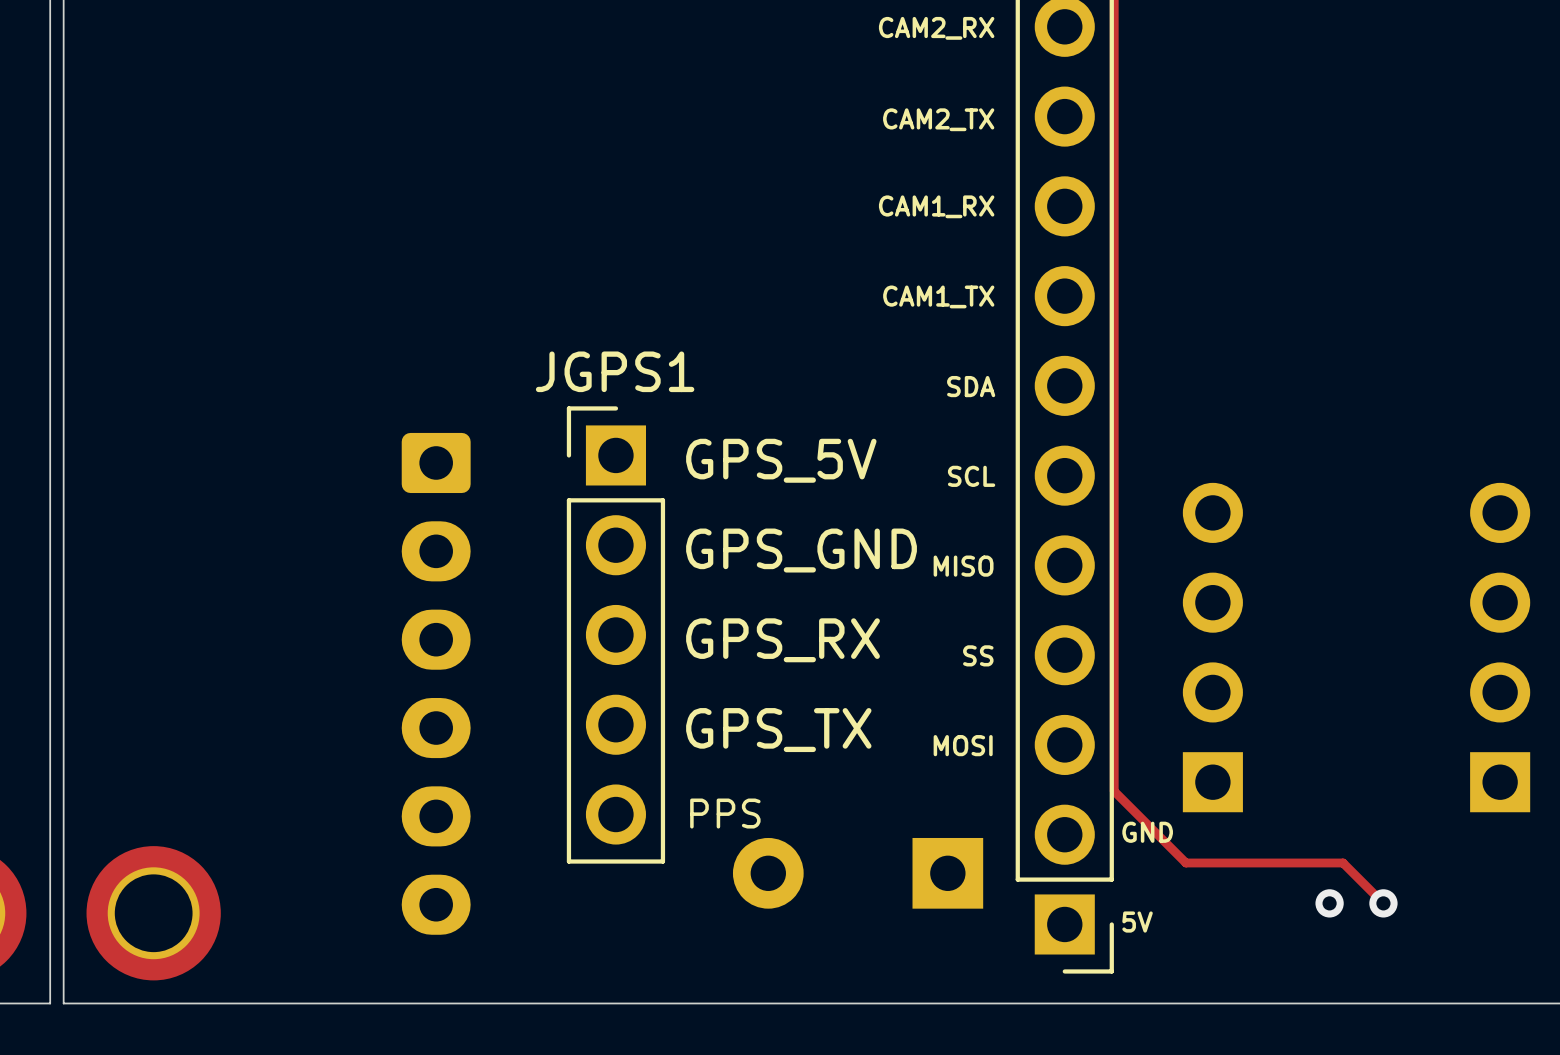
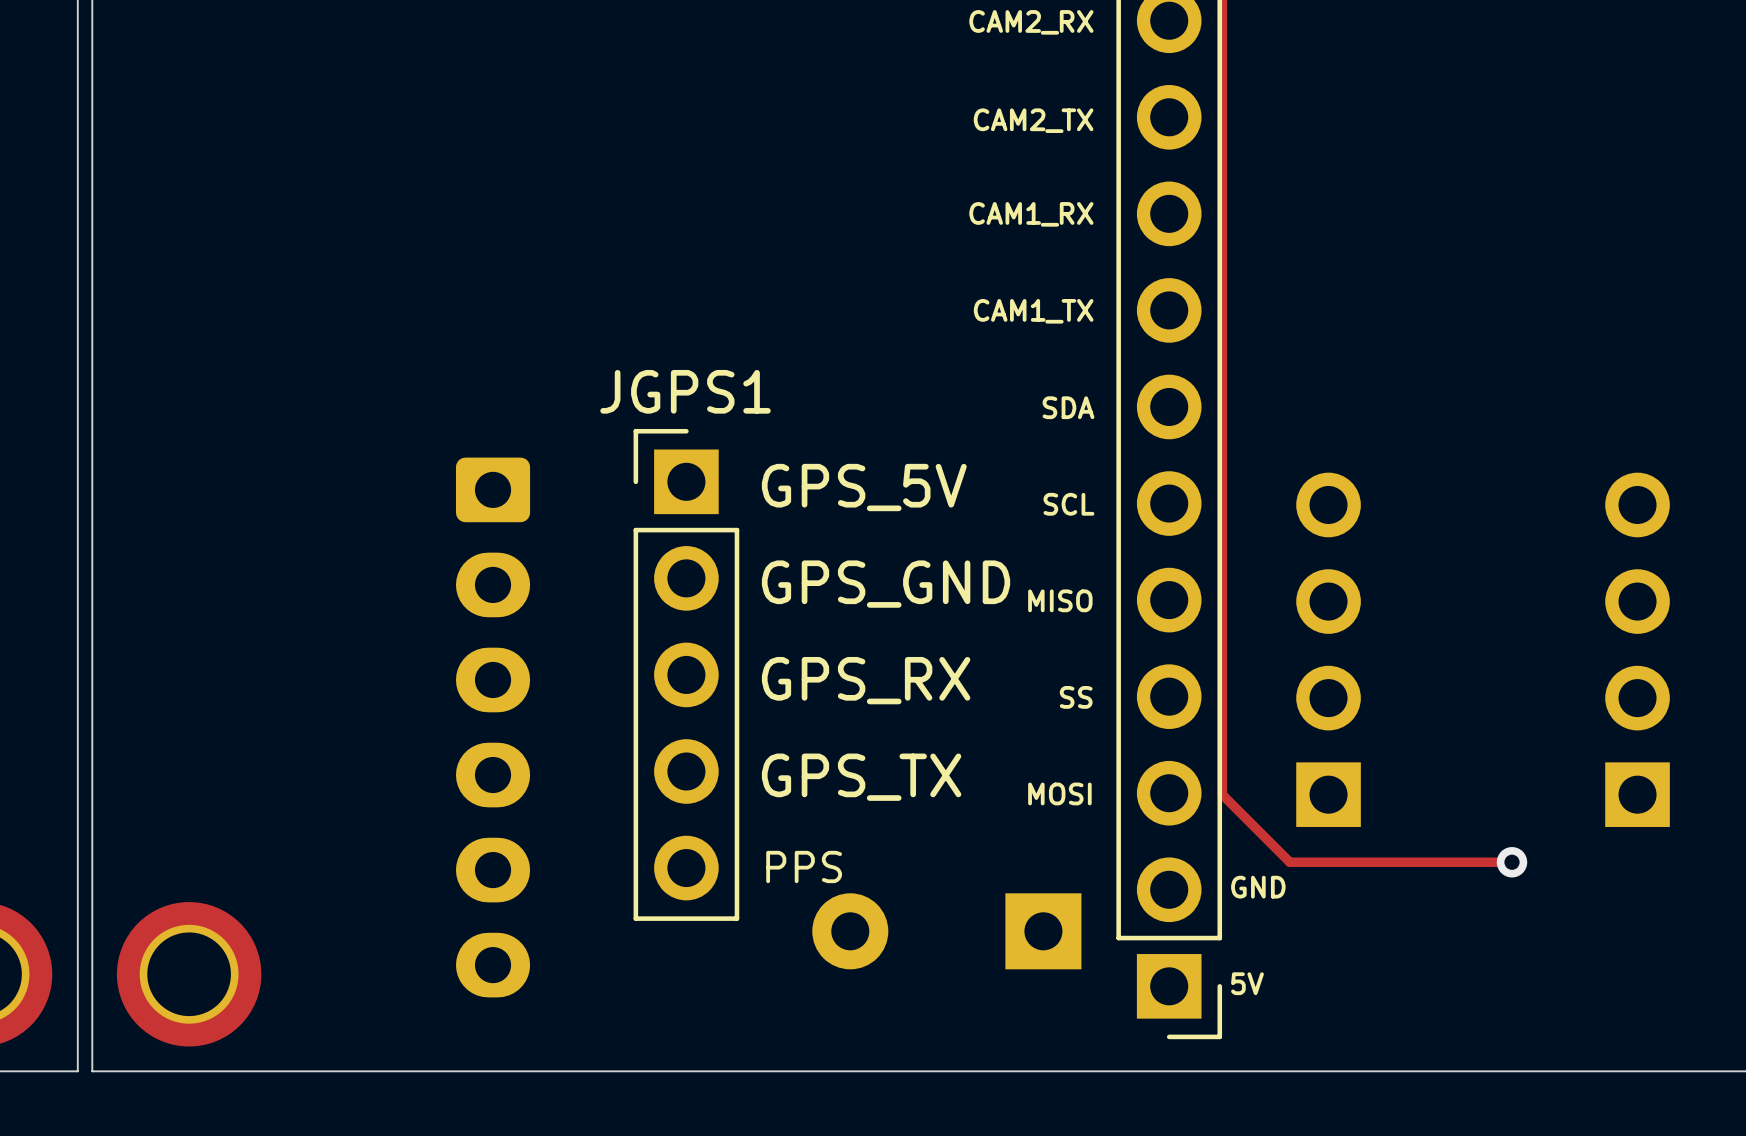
part position: (1212, 647) -> (1328, 649)
part position: (1500, 647) -> (1637, 649)
track: (1114, 746) (1114, 791) (1185, 862) (1343, 862) (1383, 903) -> (1222, 794) (1289, 862) (1512, 862)
via: none -> (1512, 862)
via: (1329, 903) -> none
via: (1383, 903) -> none

